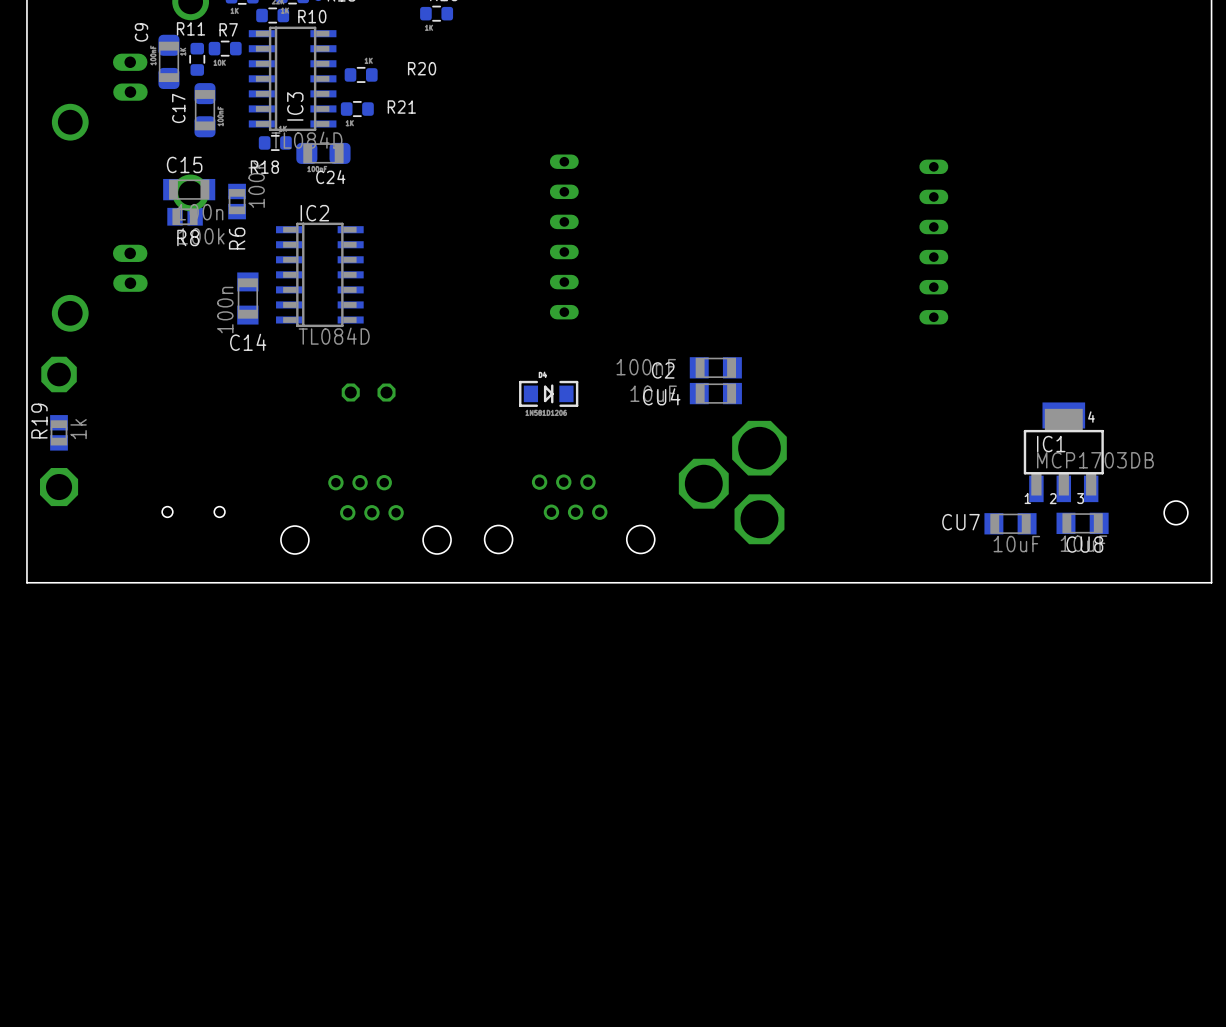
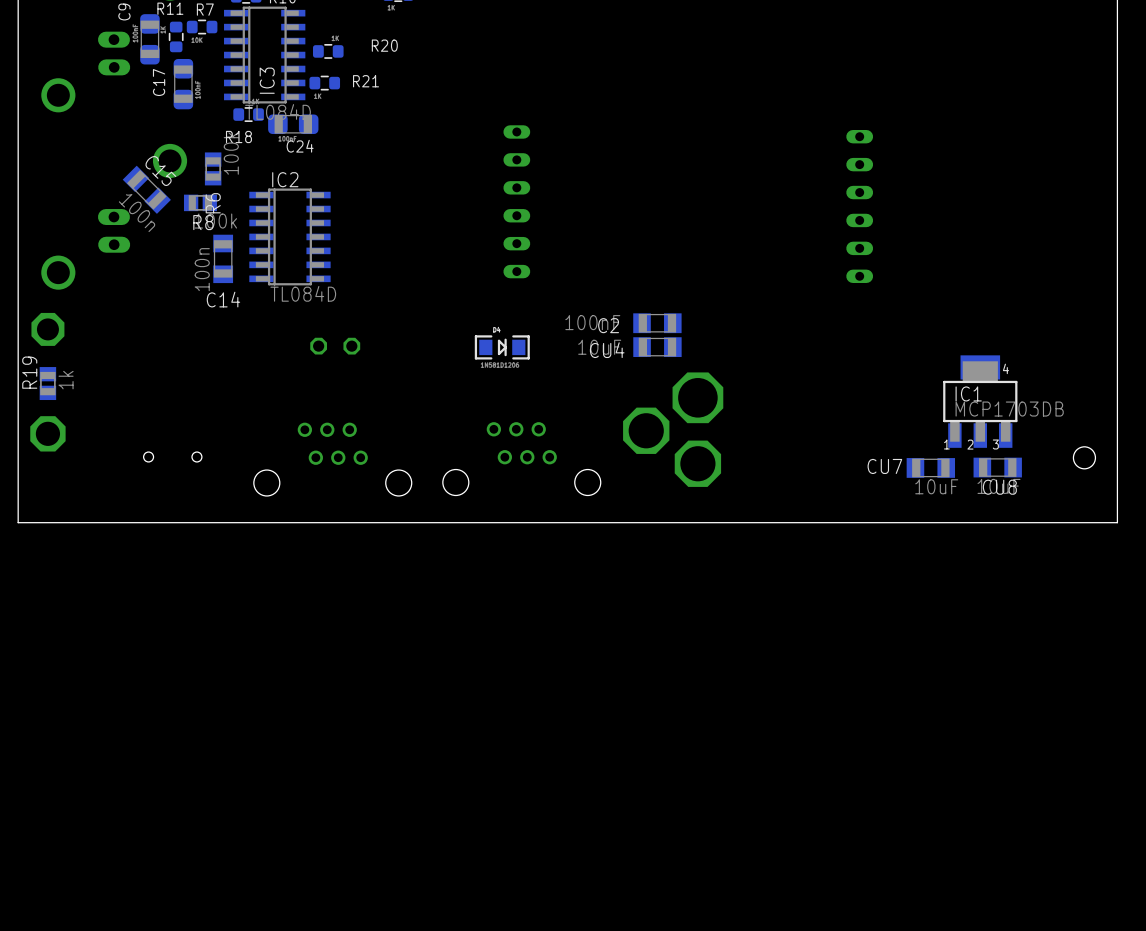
C15 rotation: 0° (189, 189) -> 45° clockwise (146, 189)
C15 position: (189, 189) -> (146, 189)
R8 position: (185, 216) -> (200, 202)

